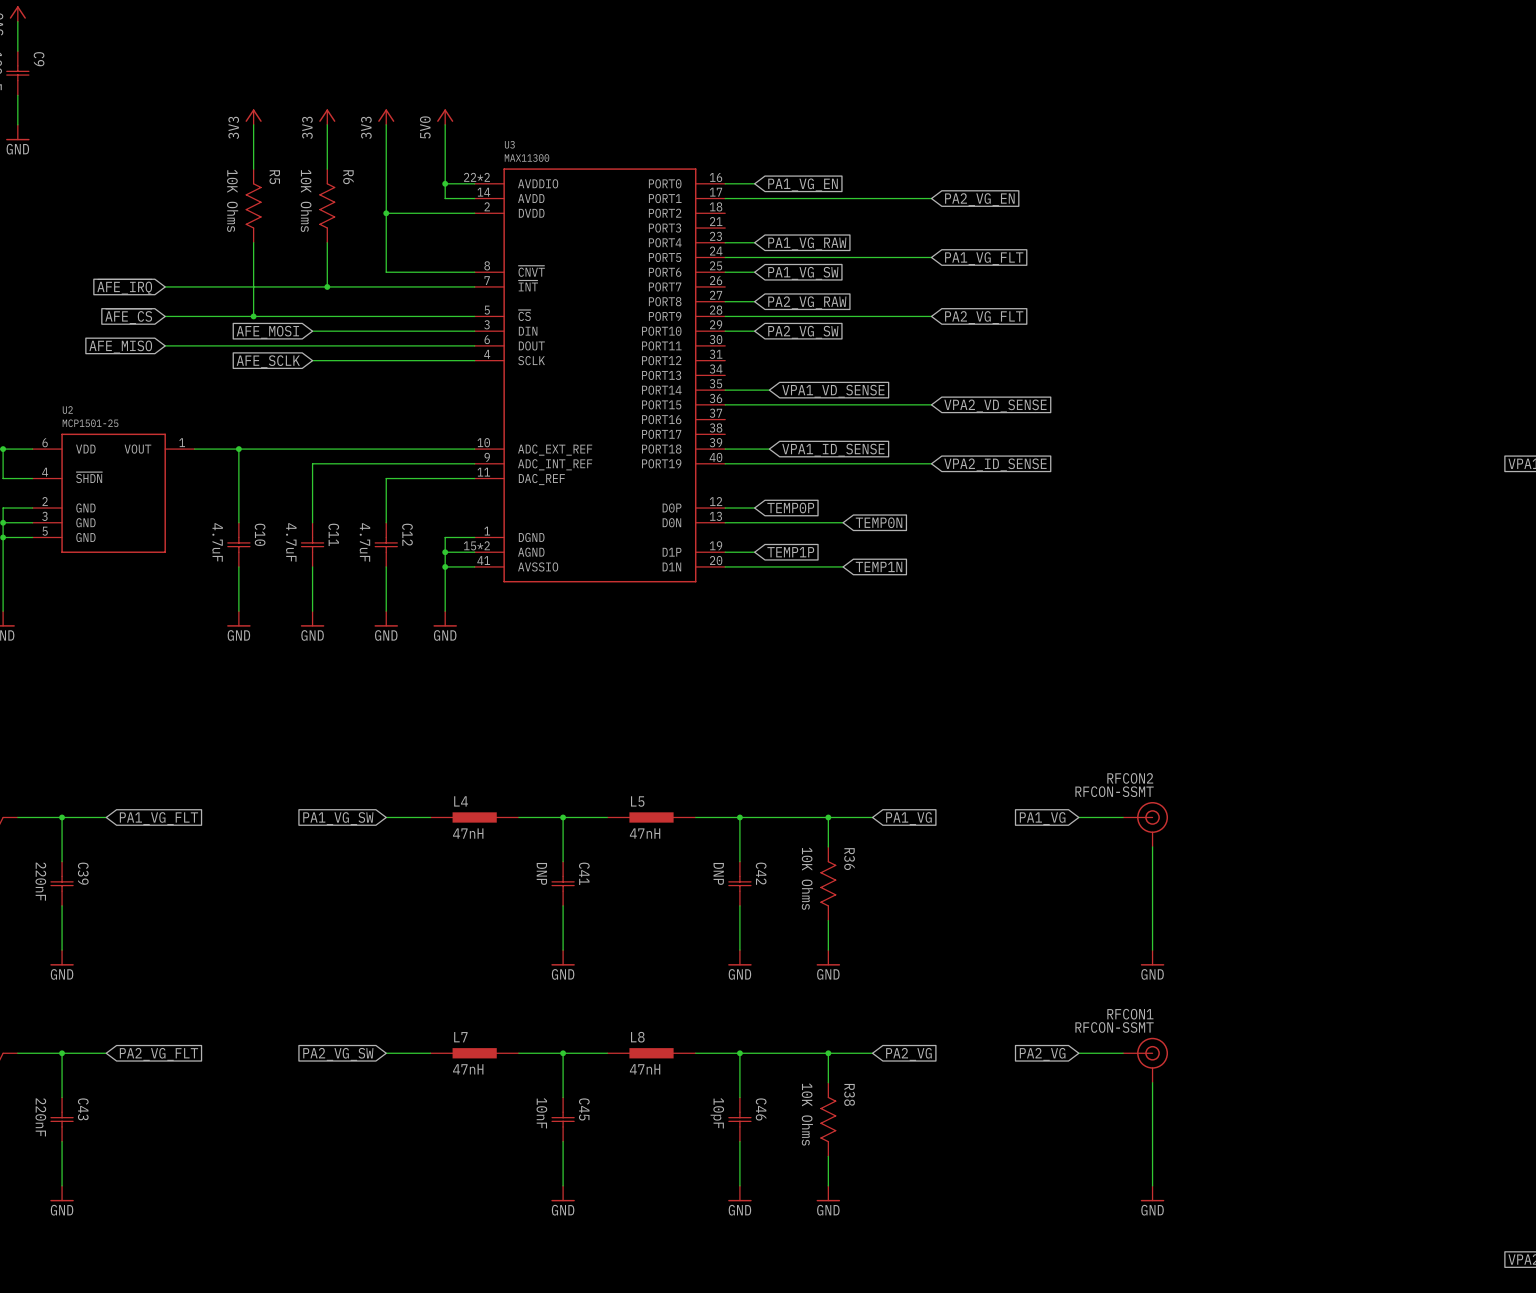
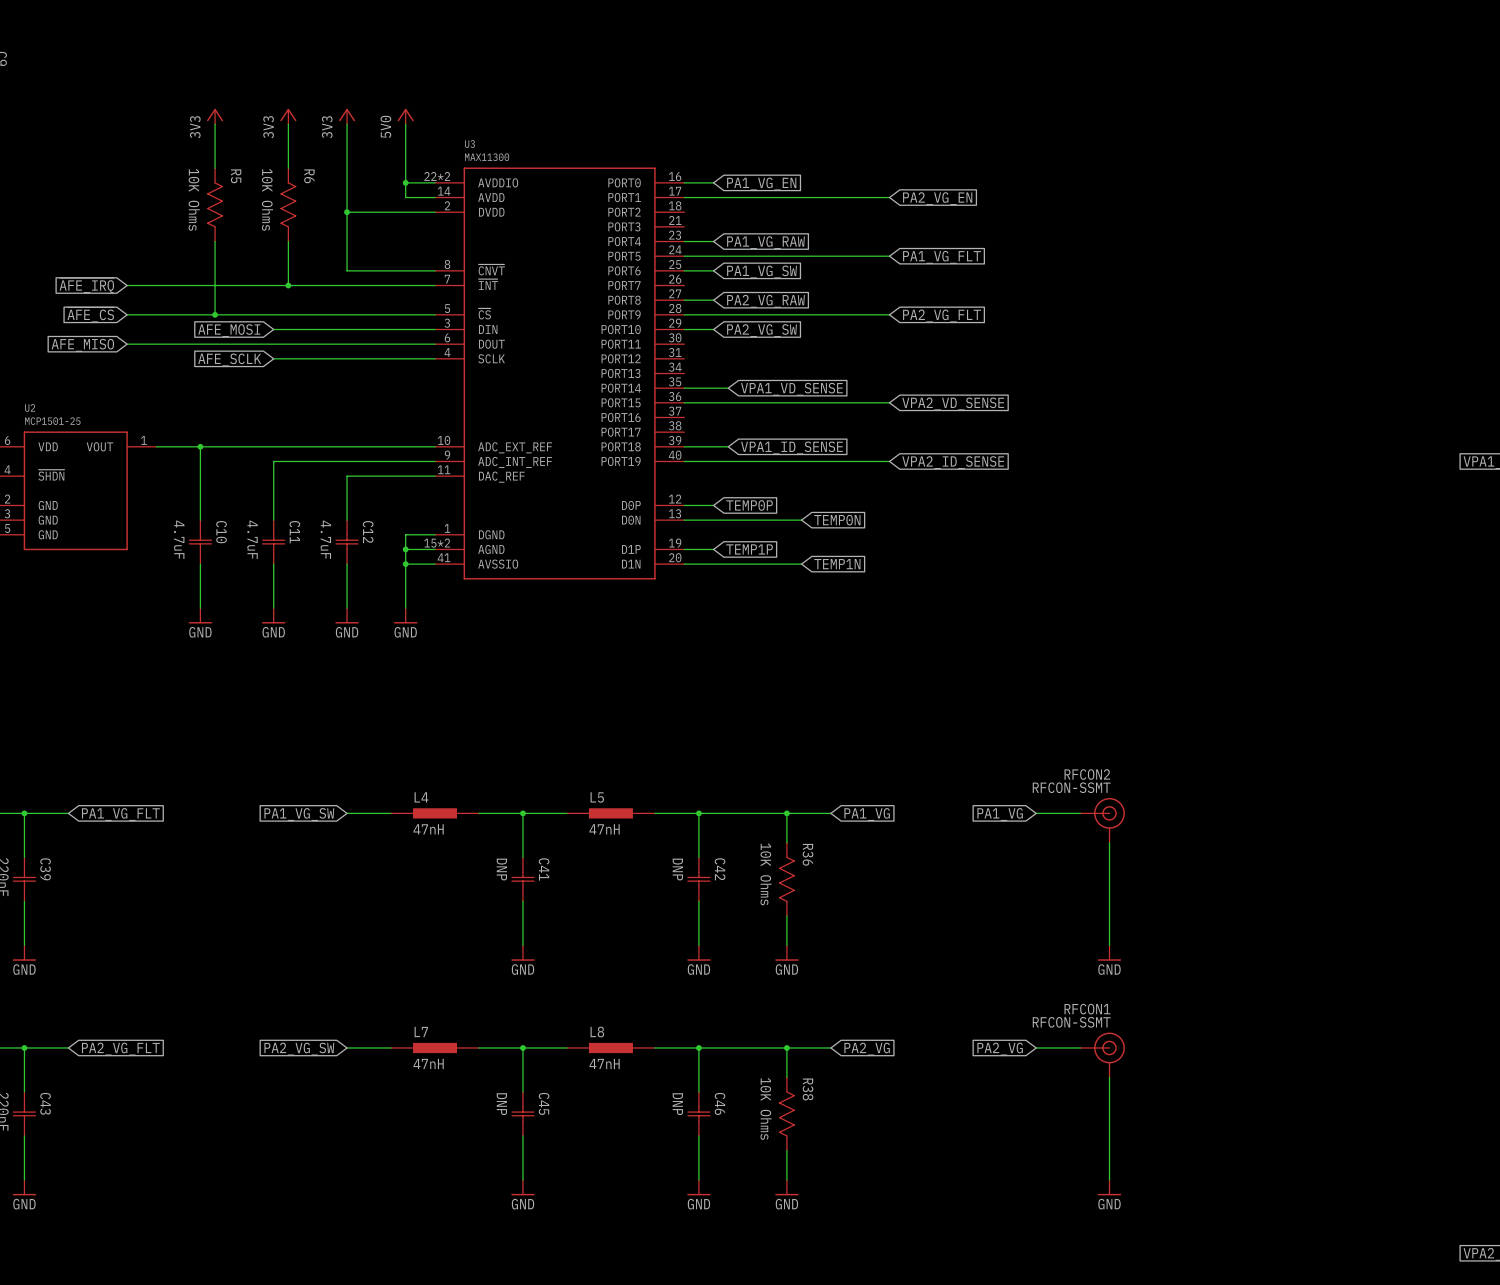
C45 value: 10nF (541, 1113) -> DNP (501, 1104)
C46 value: 10pF (717, 1113) -> DNP (677, 1104)

